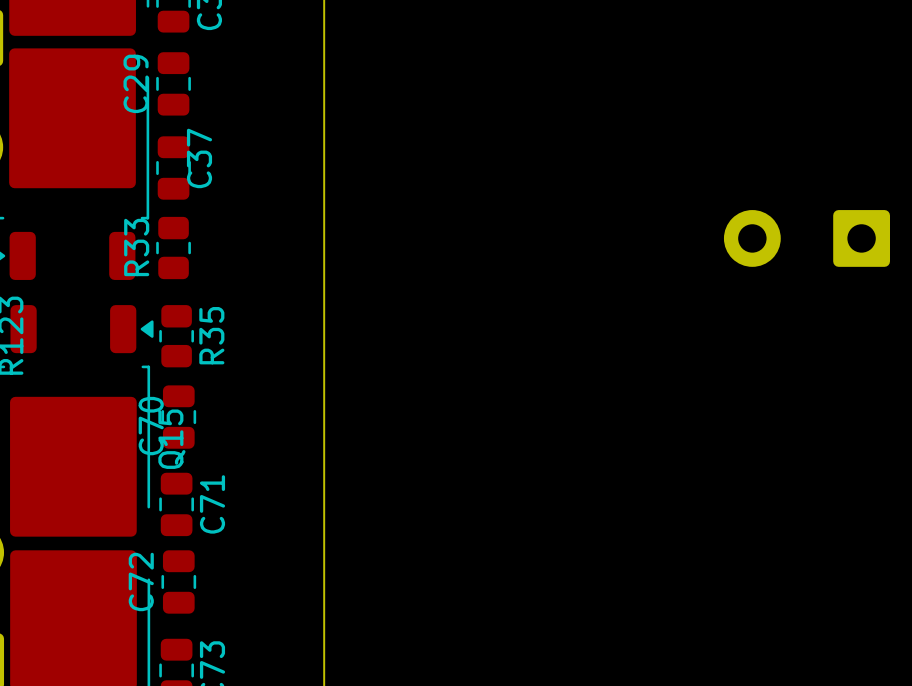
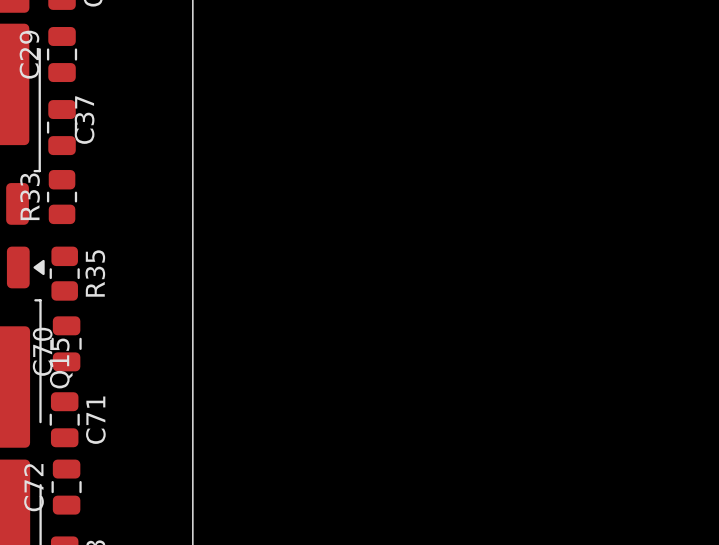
part: (806, 238) -> none

